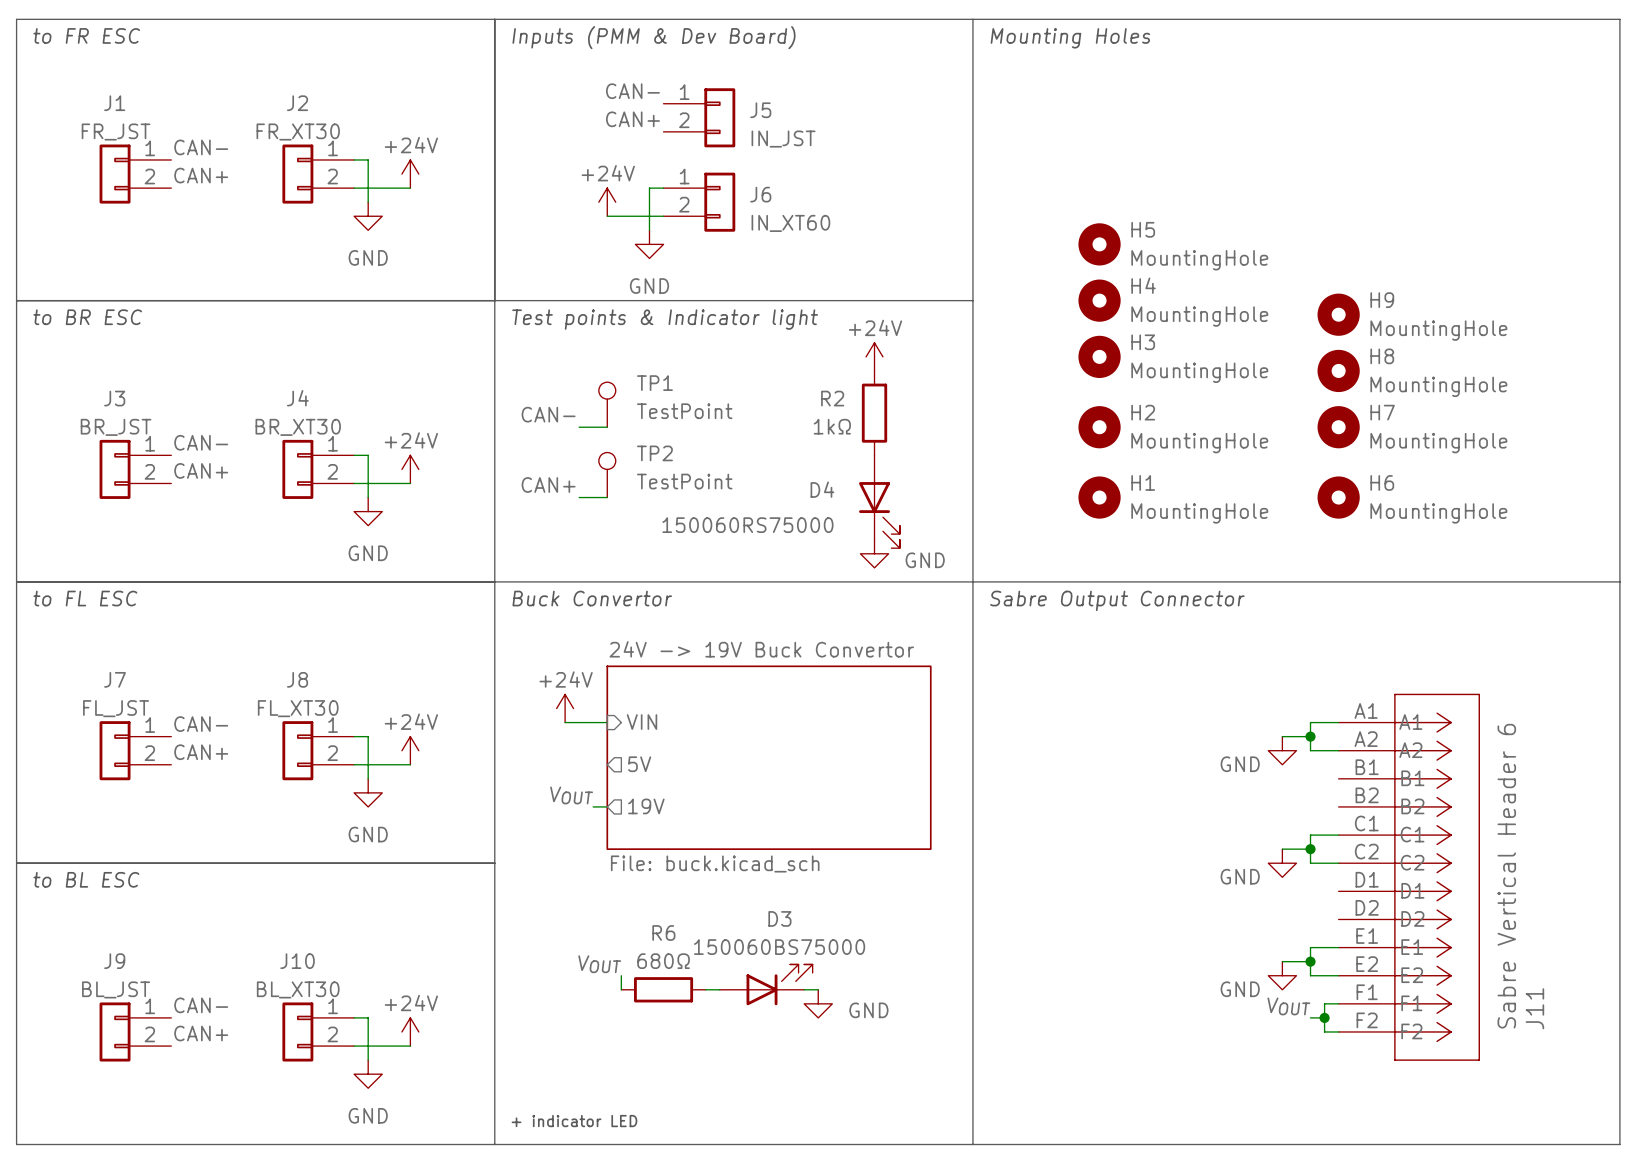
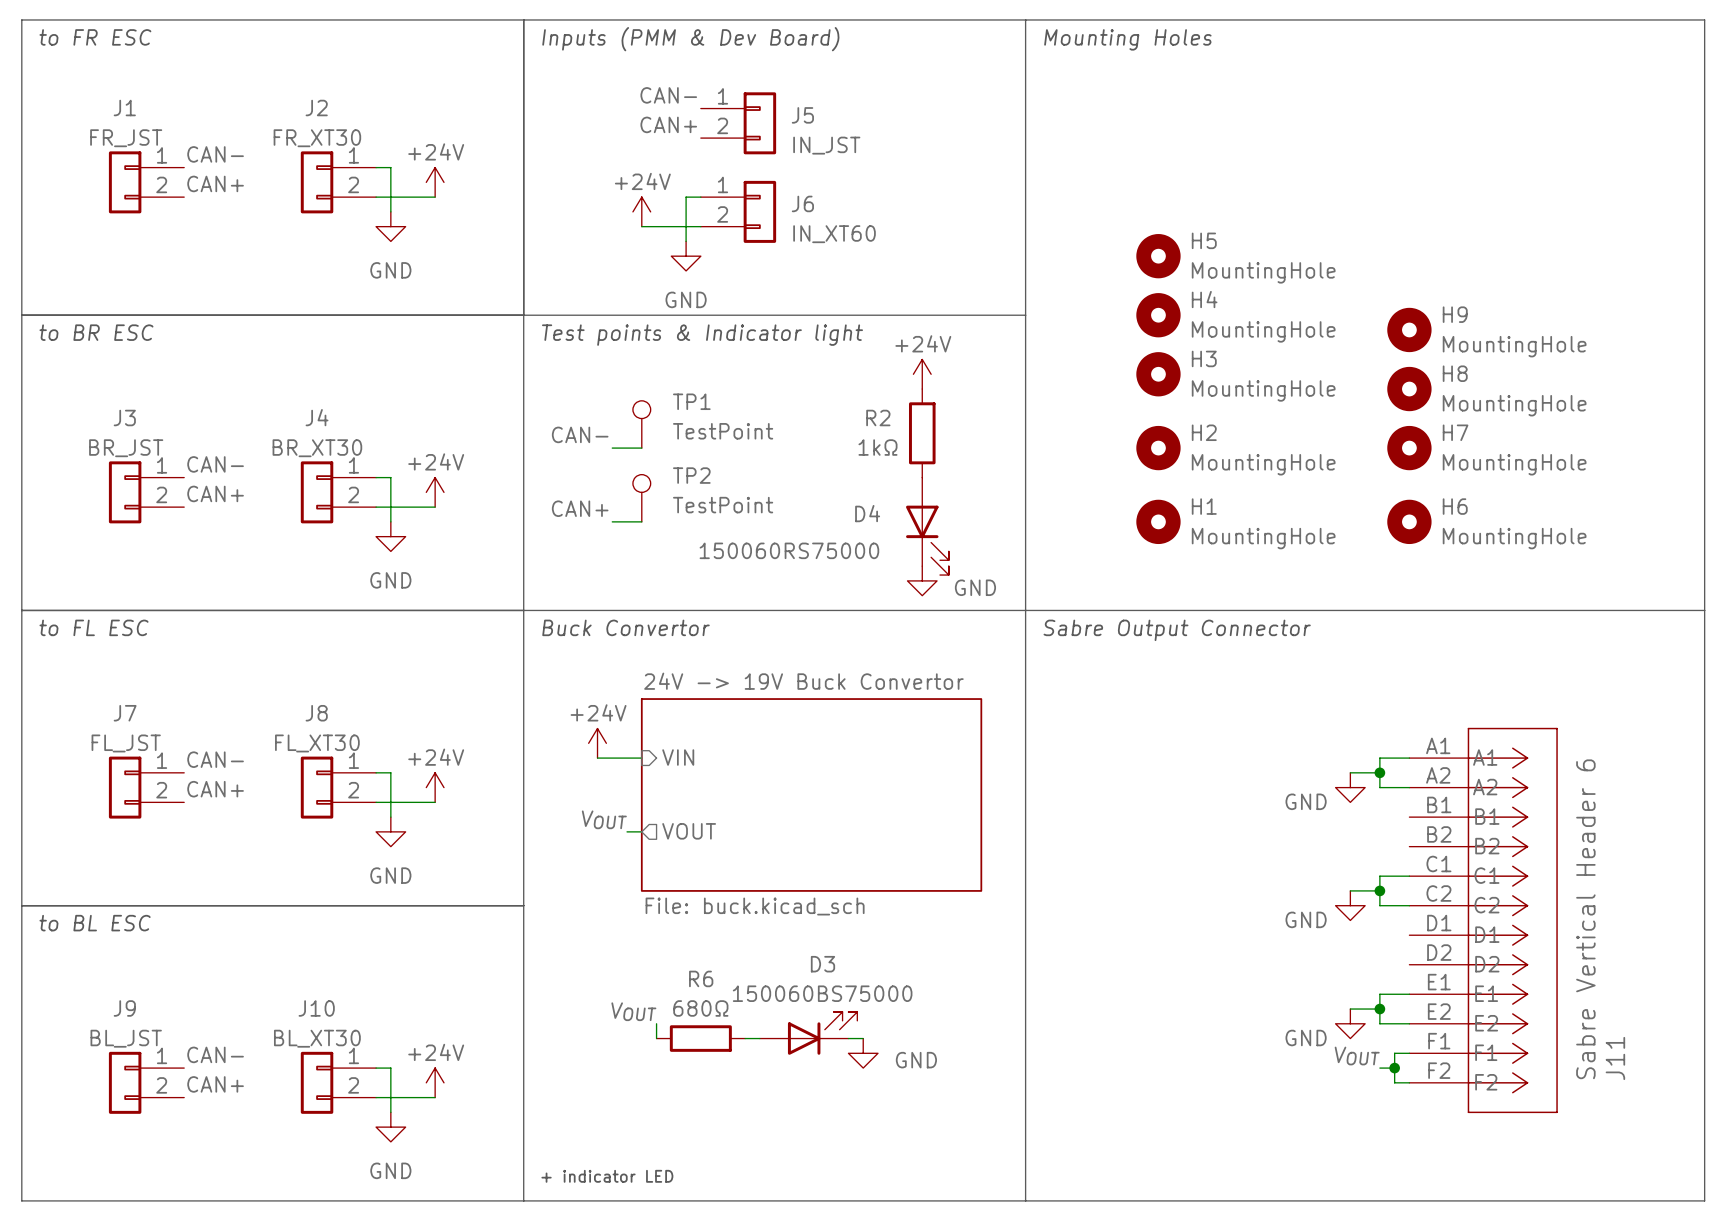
sheet pin: 5V (639, 764) -> none
sheet pin: none -> VOUT (689, 831)
label position: VOUT (571, 795) -> VOUT (604, 819)
wire: (593, 806) (607, 806) -> (627, 831) (641, 831)
sheet pin: 19V (646, 806) -> none

